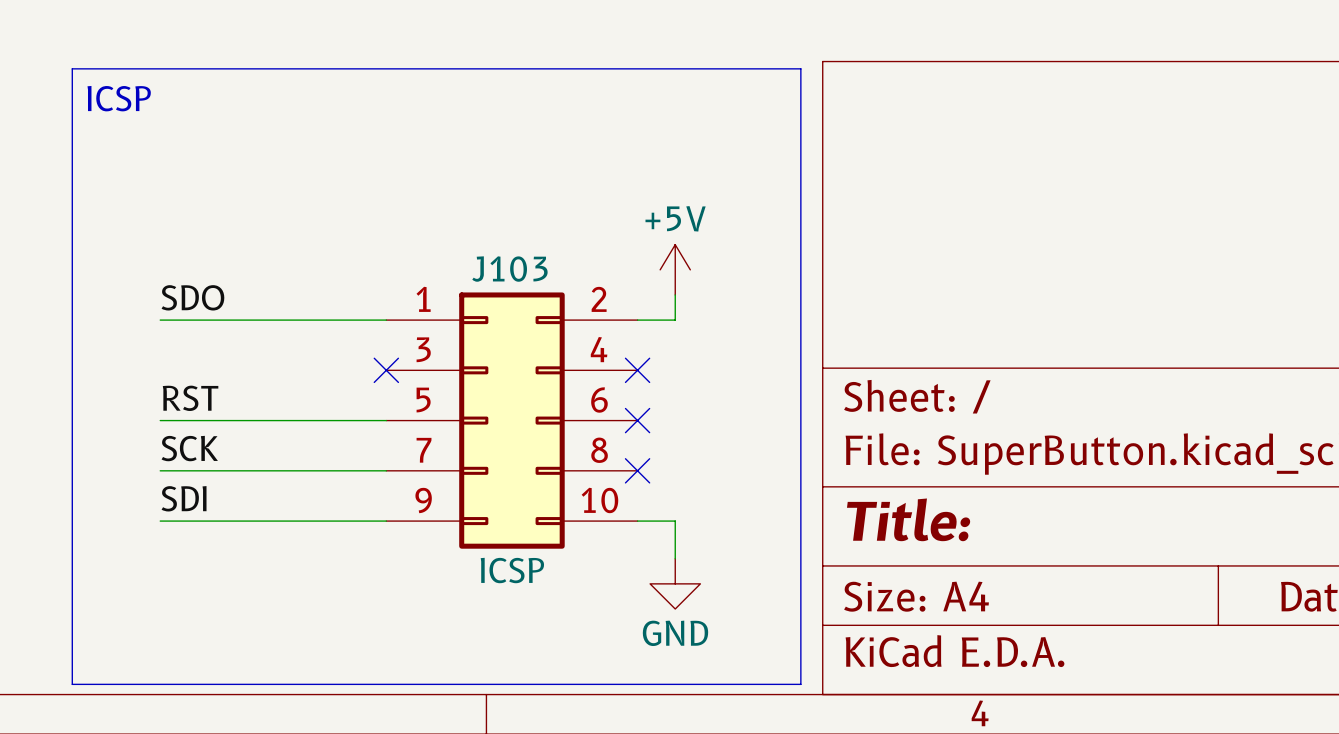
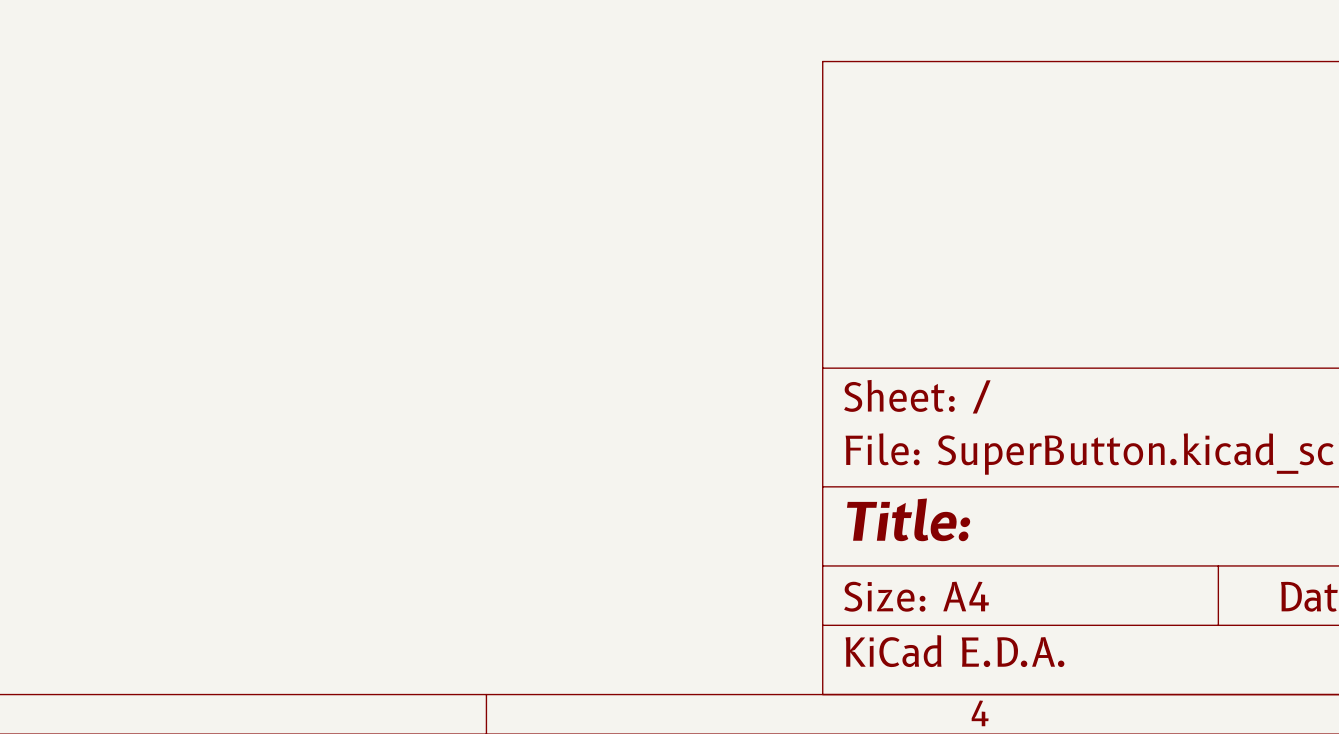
line: (72, 68) (800, 68) (800, 684) (72, 684) (72, 68) -> none
text: ICSP (119, 98) -> none
power symbol: +5V (675, 269) -> none
wire: (675, 294) (675, 320) (637, 320) -> none
label: SDO (192, 297) -> none
wire: (160, 320) (386, 320) -> none
no-connect mark: (386, 370) -> none
no-connect mark: (637, 370) -> none
label: RST (190, 398) -> none
wire: (160, 420) (386, 420) -> none
J103: ICSP (511, 420) -> none
no-connect mark: (637, 420) -> none
label: SCK (189, 448) -> none
wire: (160, 470) (386, 470) -> none
no-connect mark: (637, 470) -> none
label: SDI (184, 498) -> none
wire: (160, 521) (386, 521) -> none
wire: (637, 521) (675, 521) (675, 558) -> none
power symbol: GND (675, 583) -> none

